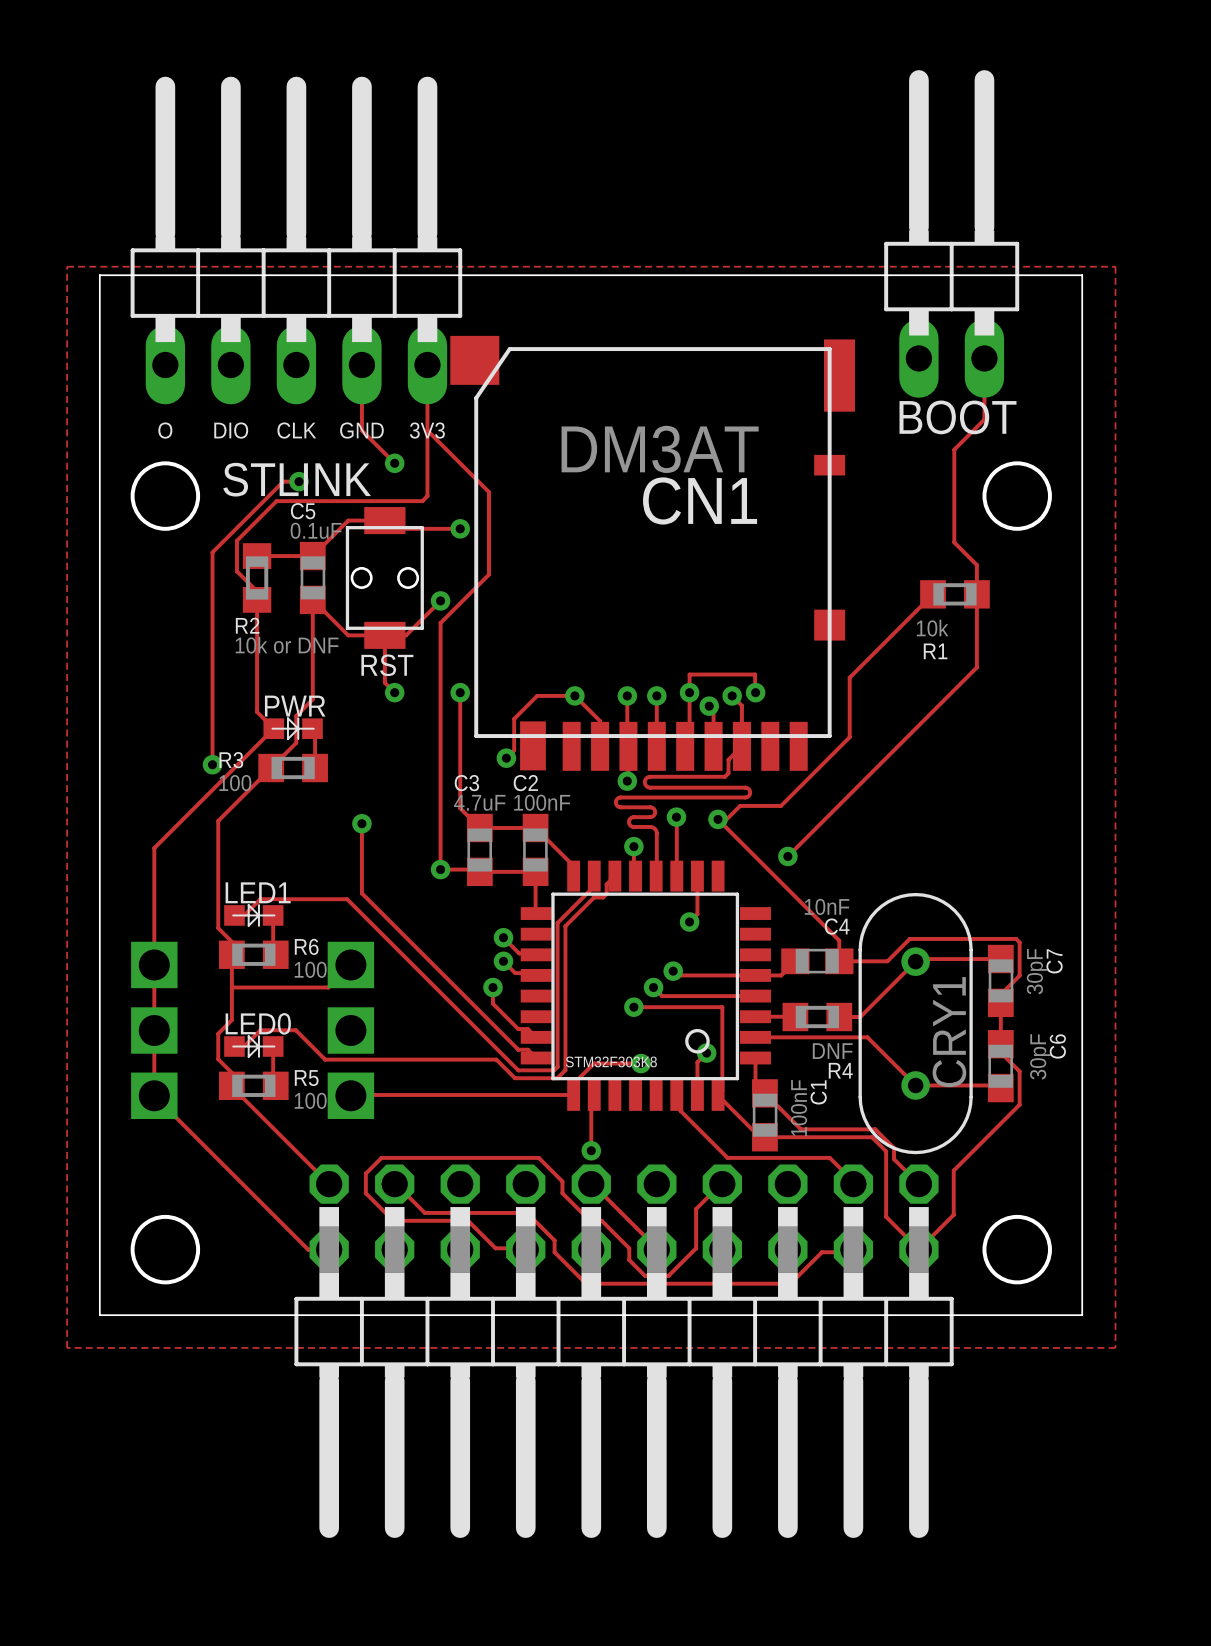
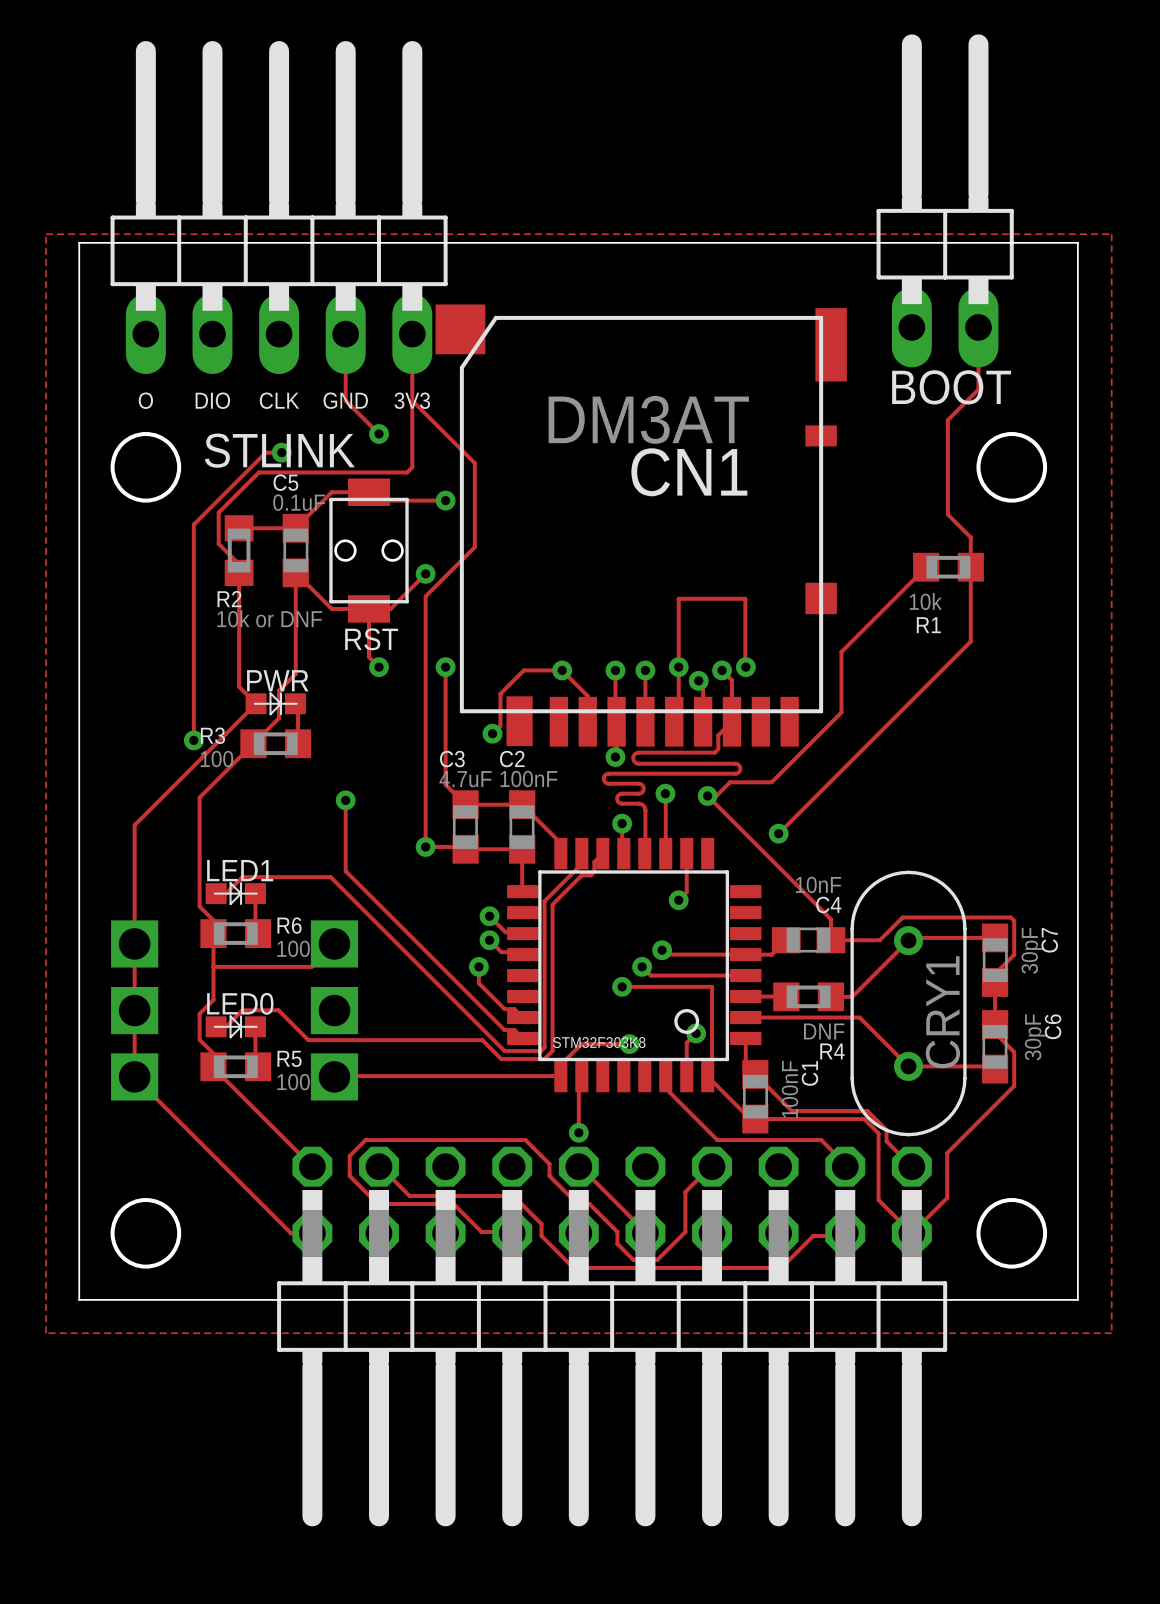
track: (689, 674) (755, 674) -> (678, 648) (678, 598) (745, 598) (745, 648)

